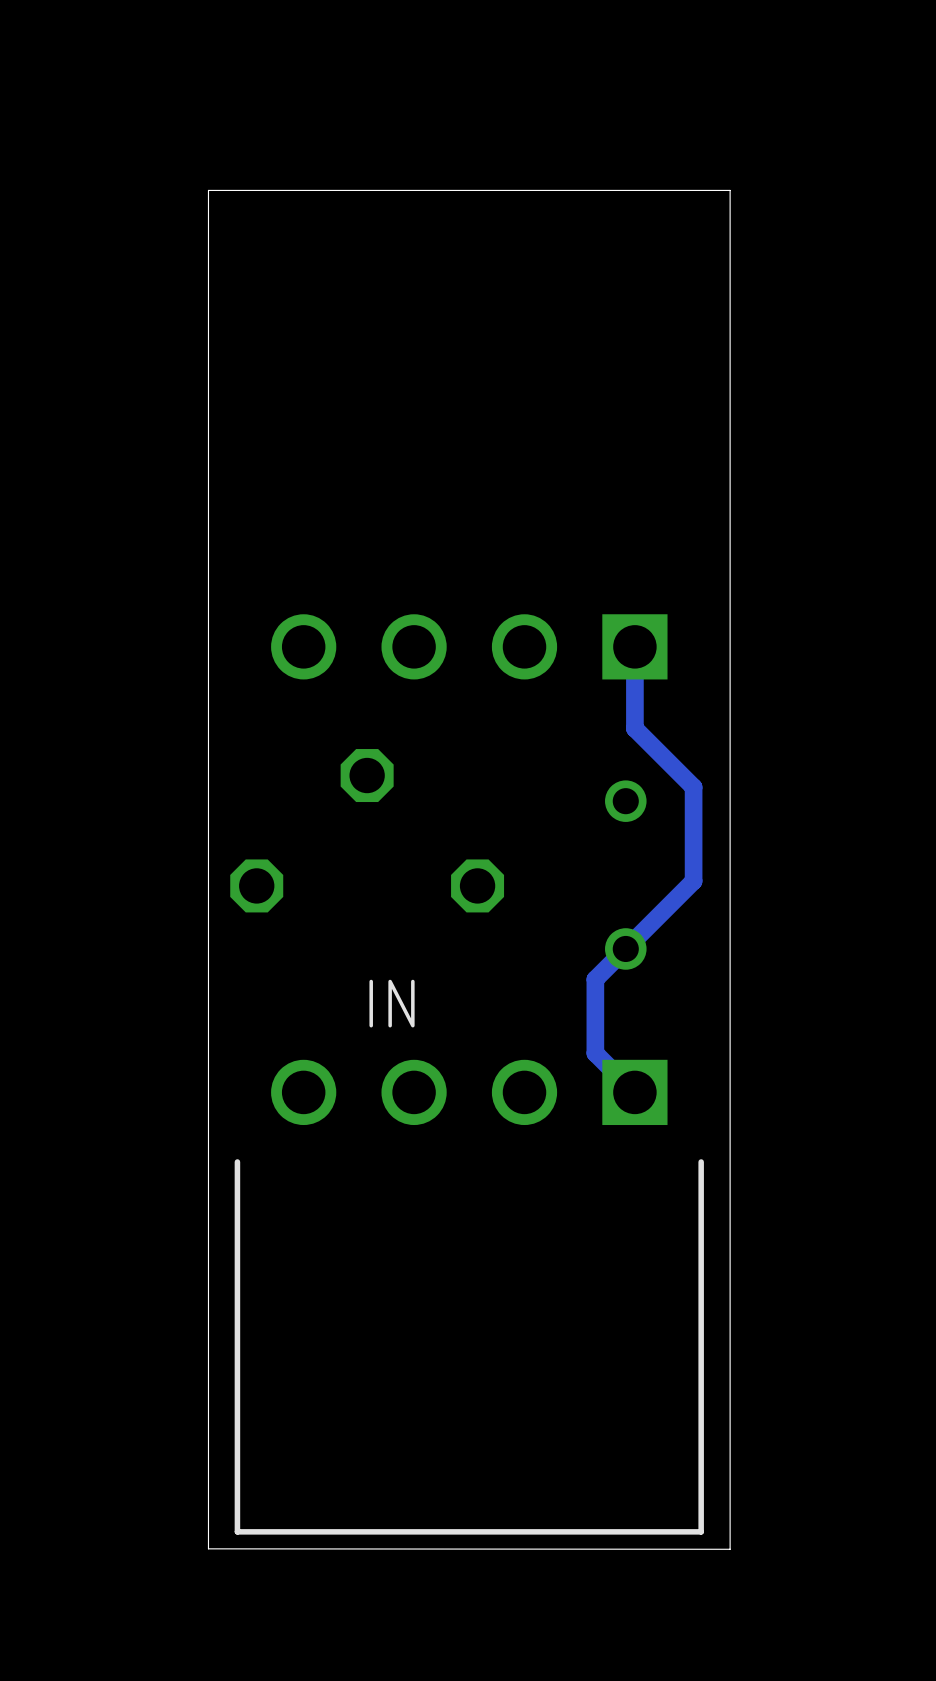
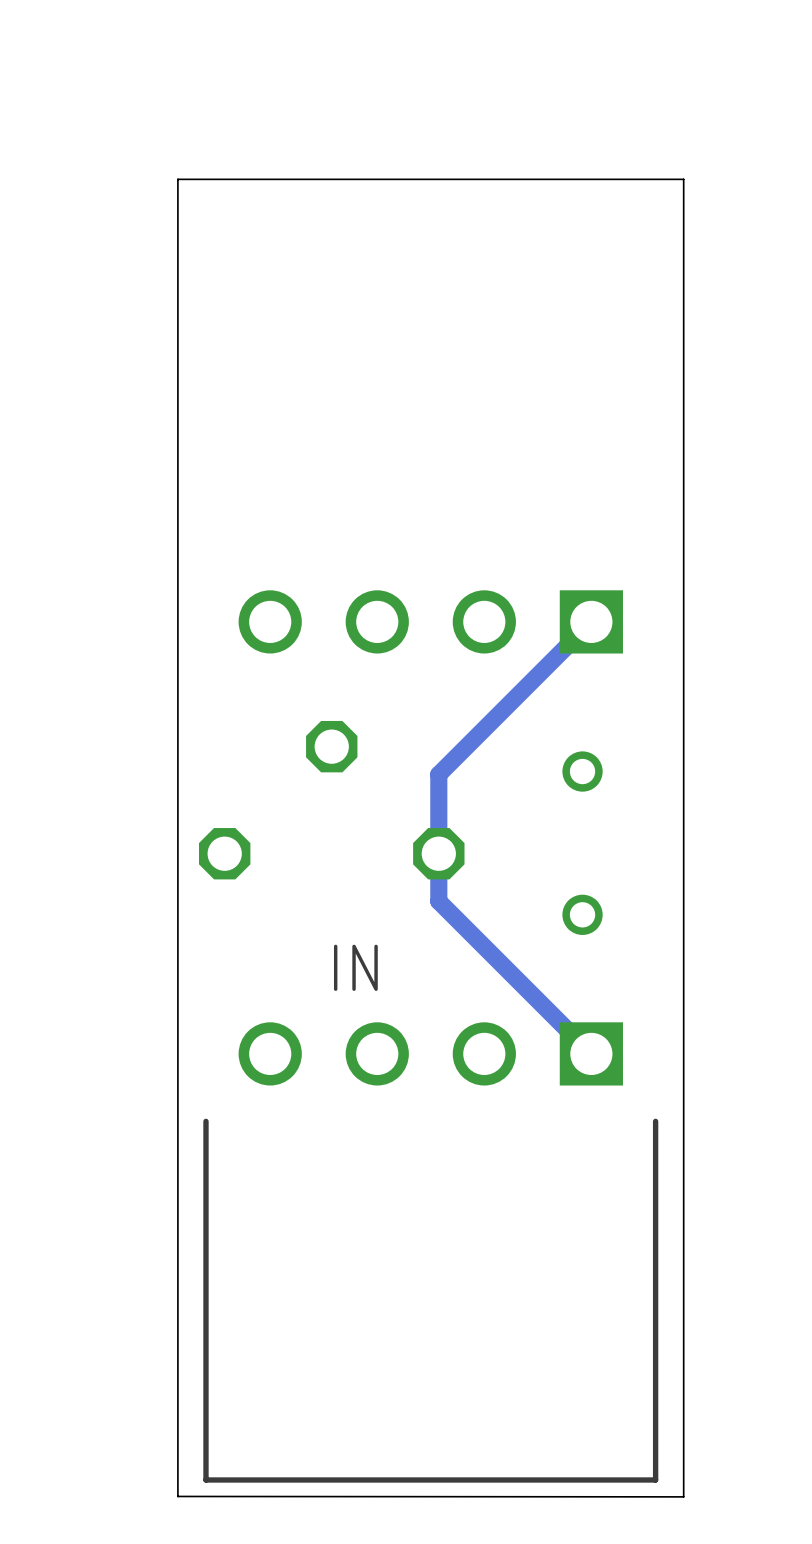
track: (634, 646) (634, 728) (693, 787) (693, 881) (595, 979) (595, 1053) (634, 1092) -> (591, 621) (438, 774) (438, 901) (591, 1053)

